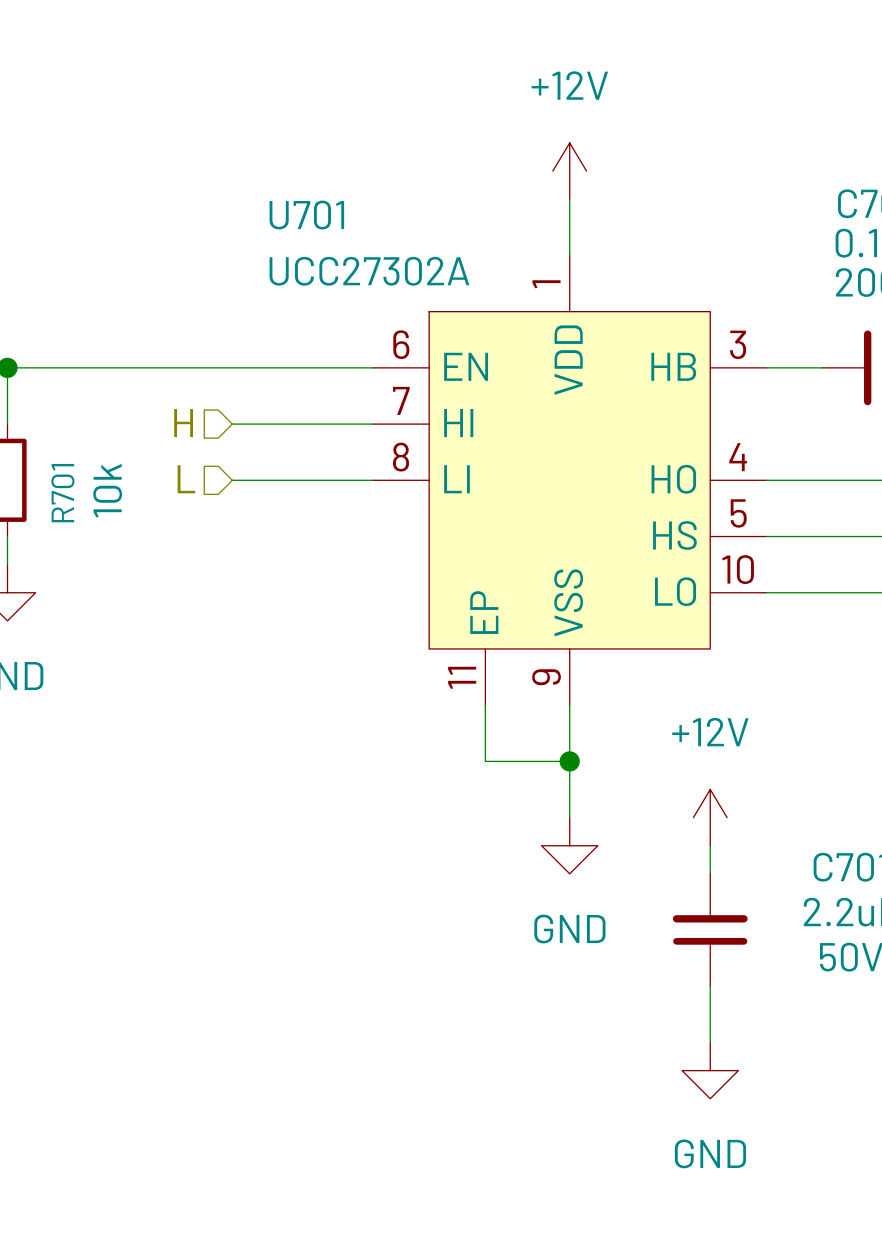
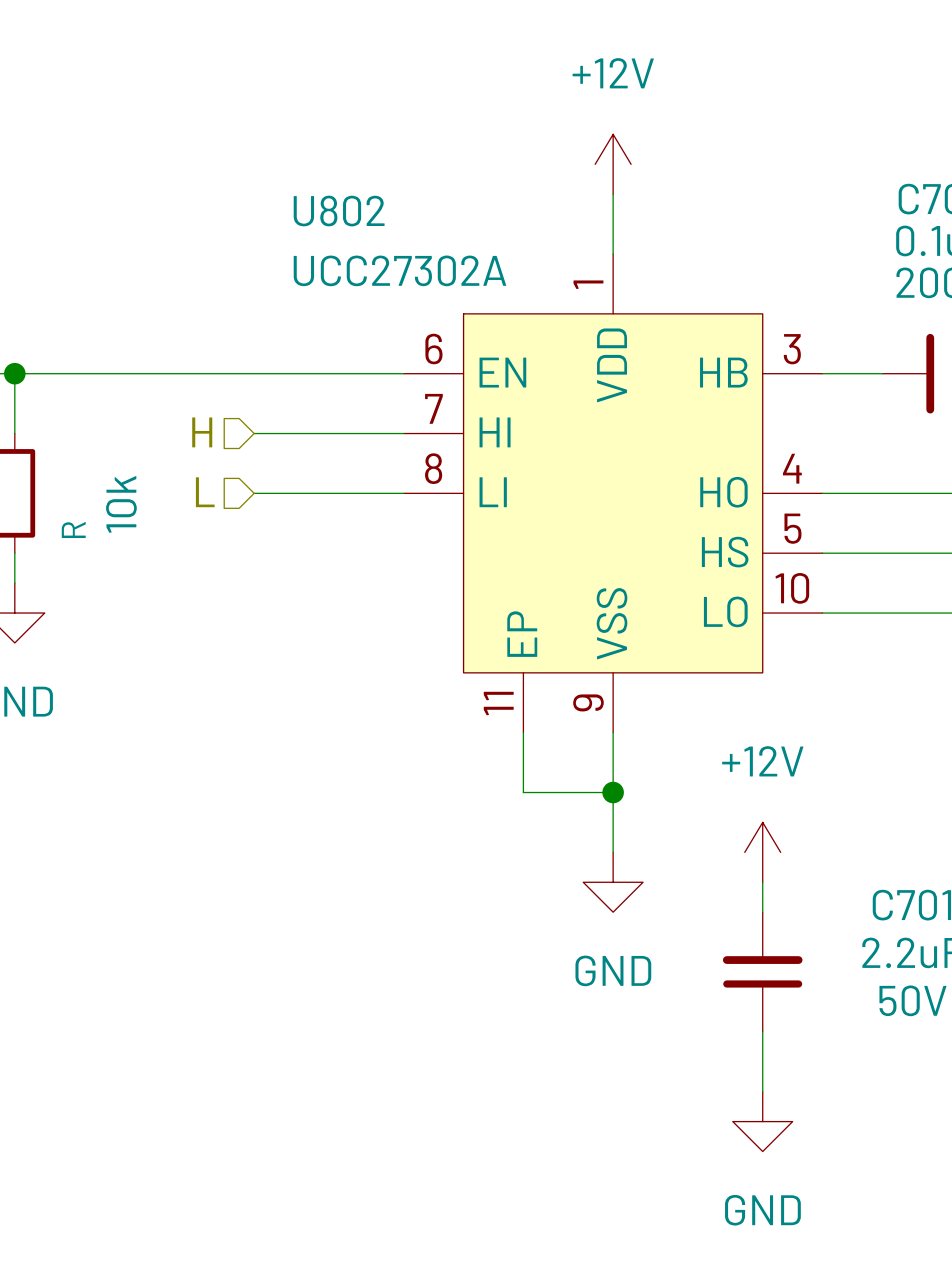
U701 name: U701 (306, 215) -> U802 (339, 211)
R701 name: R701 (62, 493) -> R (73, 530)

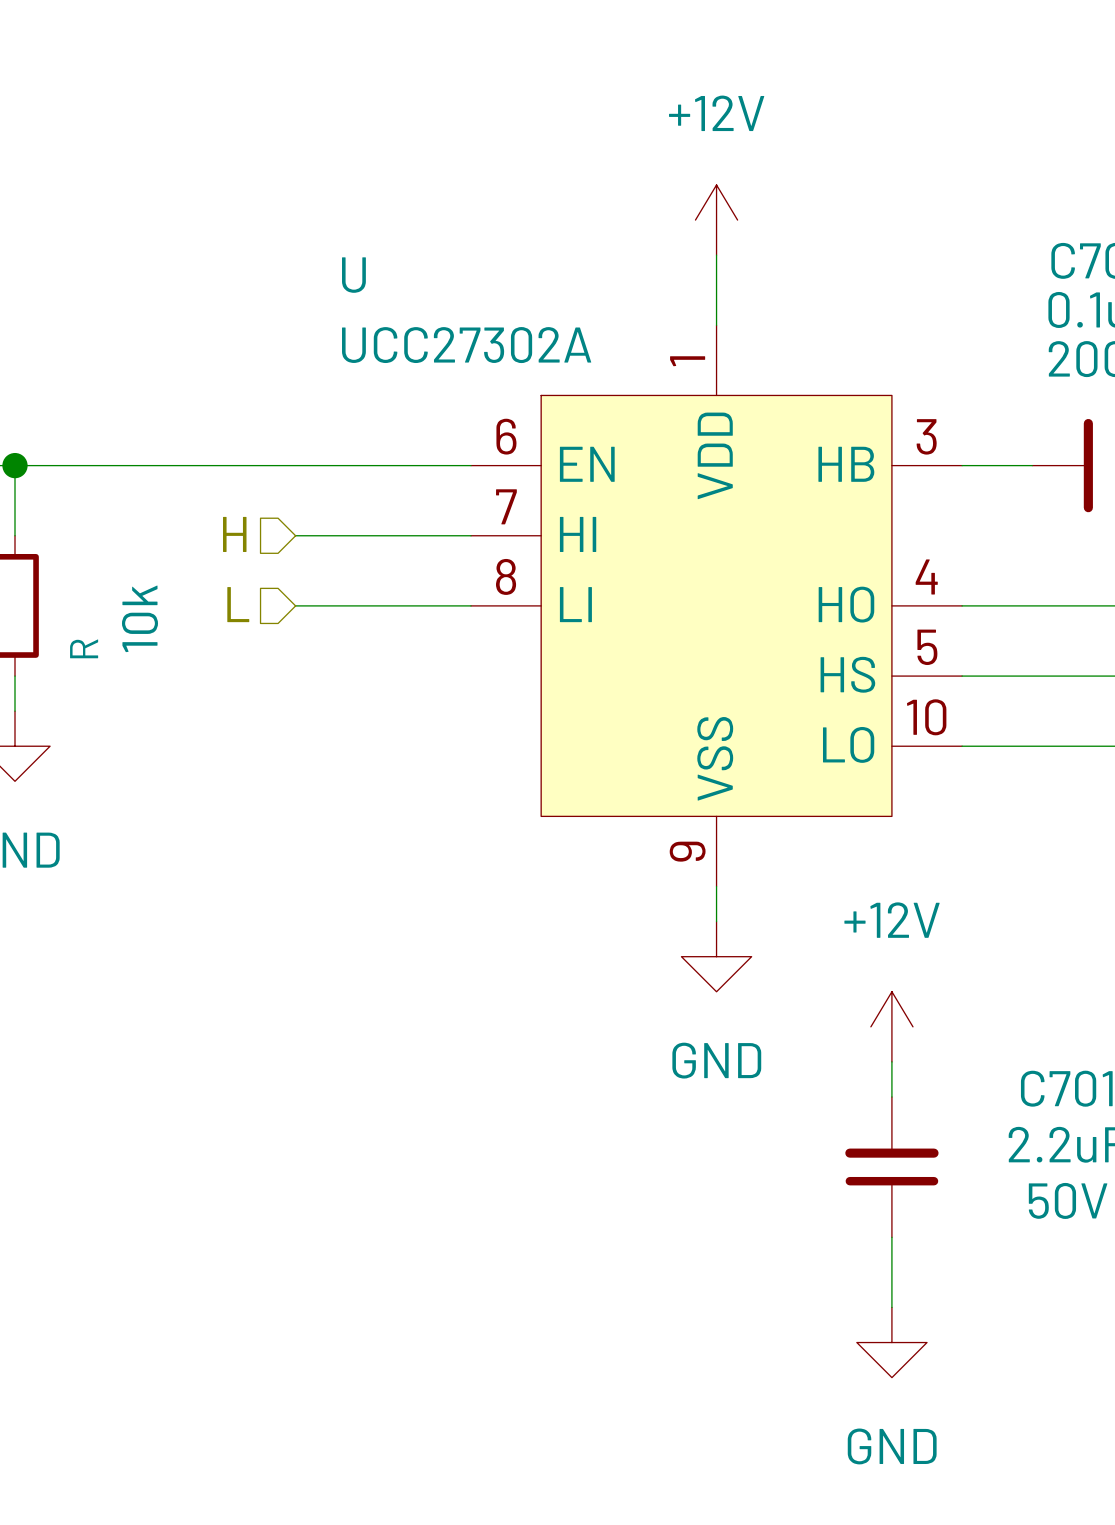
U802: UCC27302A (613, 493) -> none
U: none -> UCC27302A (716, 605)
wire: (523, 732) (523, 792) (613, 792) -> none
wire: (613, 762) (613, 852) -> none
junction: (613, 792) -> none
power symbol position: GND (613, 882) -> GND (716, 956)

